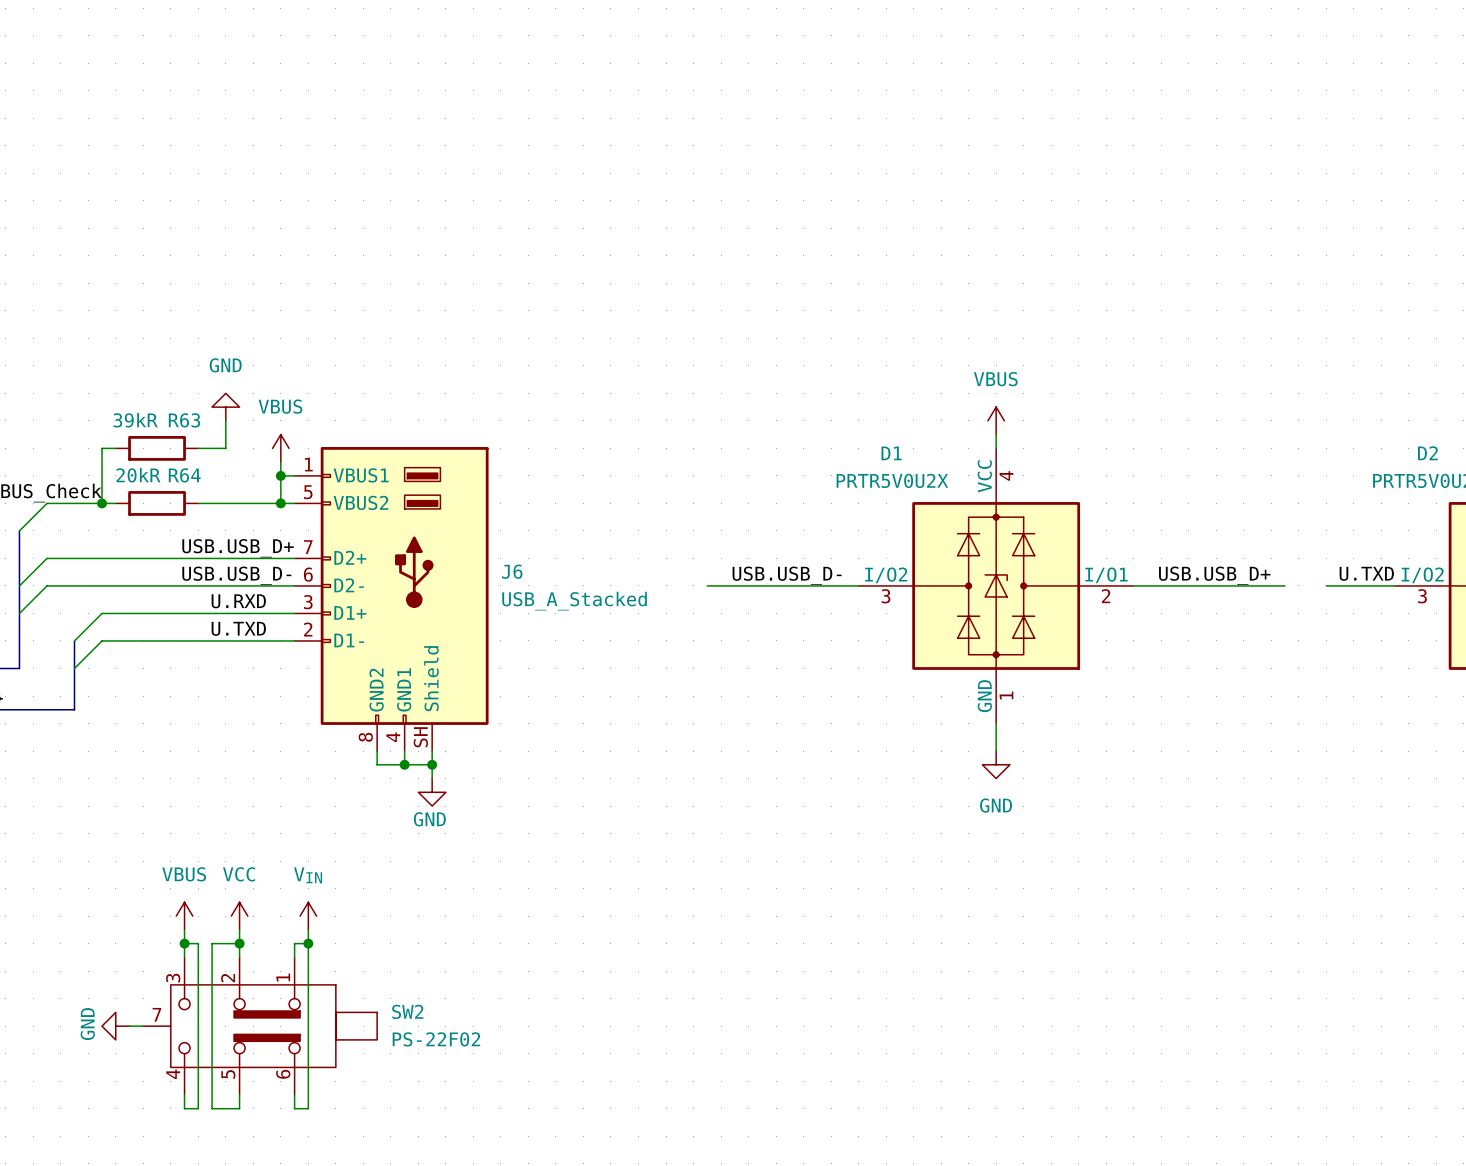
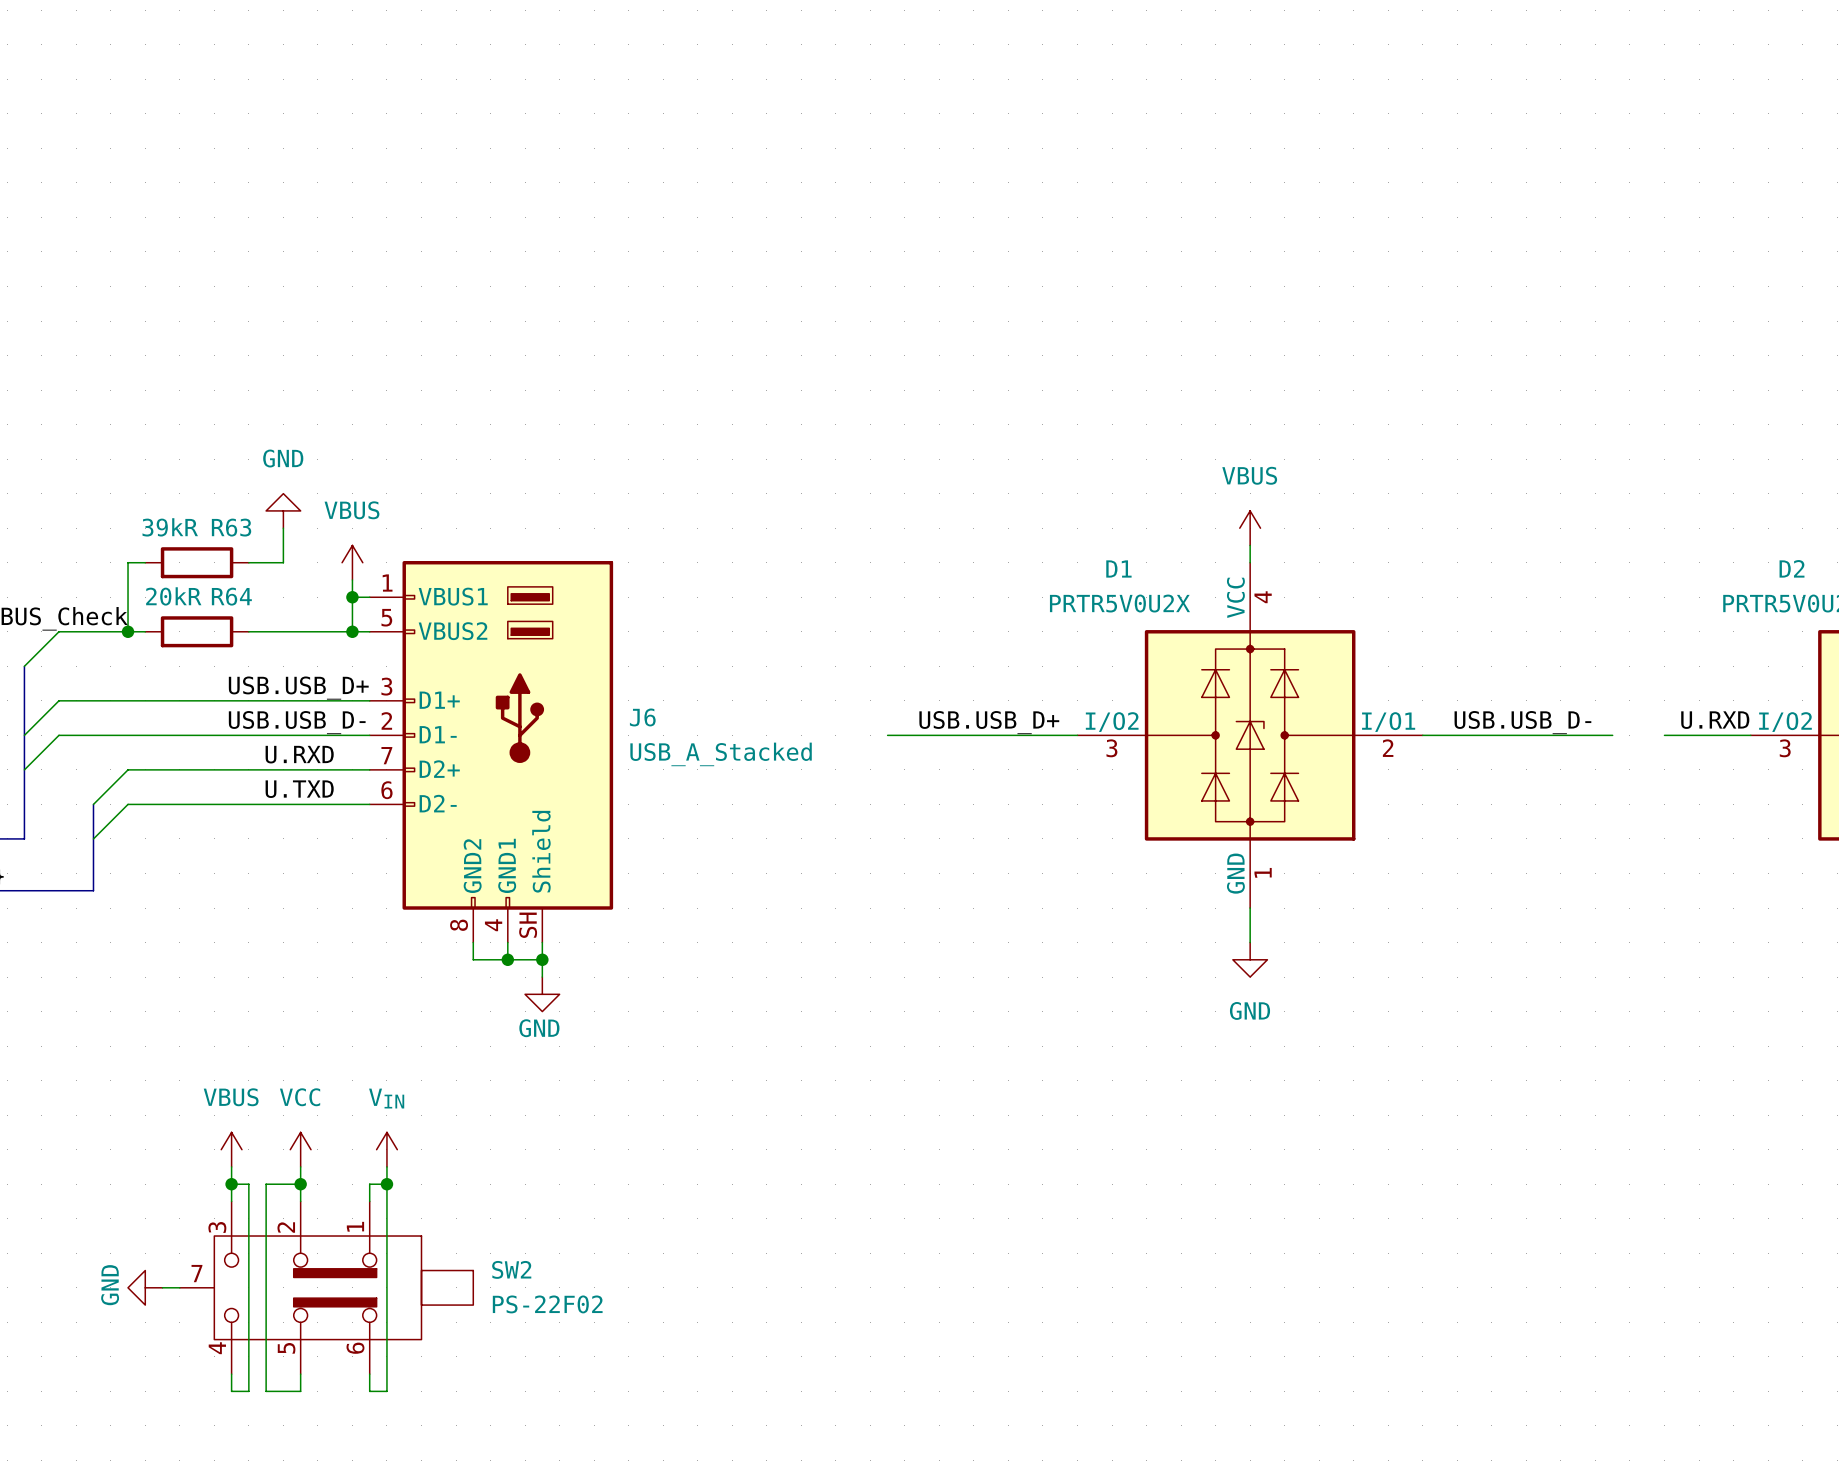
J6 pin number: 7 (308, 547) -> 3 (386, 686)
J6 pin name: D2+ (350, 557) -> D1+ (439, 700)
label: U.TXD (1366, 573) -> U.RXD (1715, 720)
J6 pin number: 6 (308, 574) -> 2 (386, 720)
label: USB.USB_D- (787, 575) -> USB.USB_D+ (989, 722)
label: USB.USB_D+ (1214, 575) -> USB.USB_D- (1522, 722)
J6 pin name: D2- (349, 585) -> D1- (438, 734)
J6 pin number: 3 (308, 602) -> 7 (386, 755)
J6 pin name: D1+ (350, 612) -> D2+ (439, 769)
J6 pin number: 2 (308, 629) -> 6 (386, 790)
J6 pin name: D1- (349, 640) -> D2- (438, 803)

